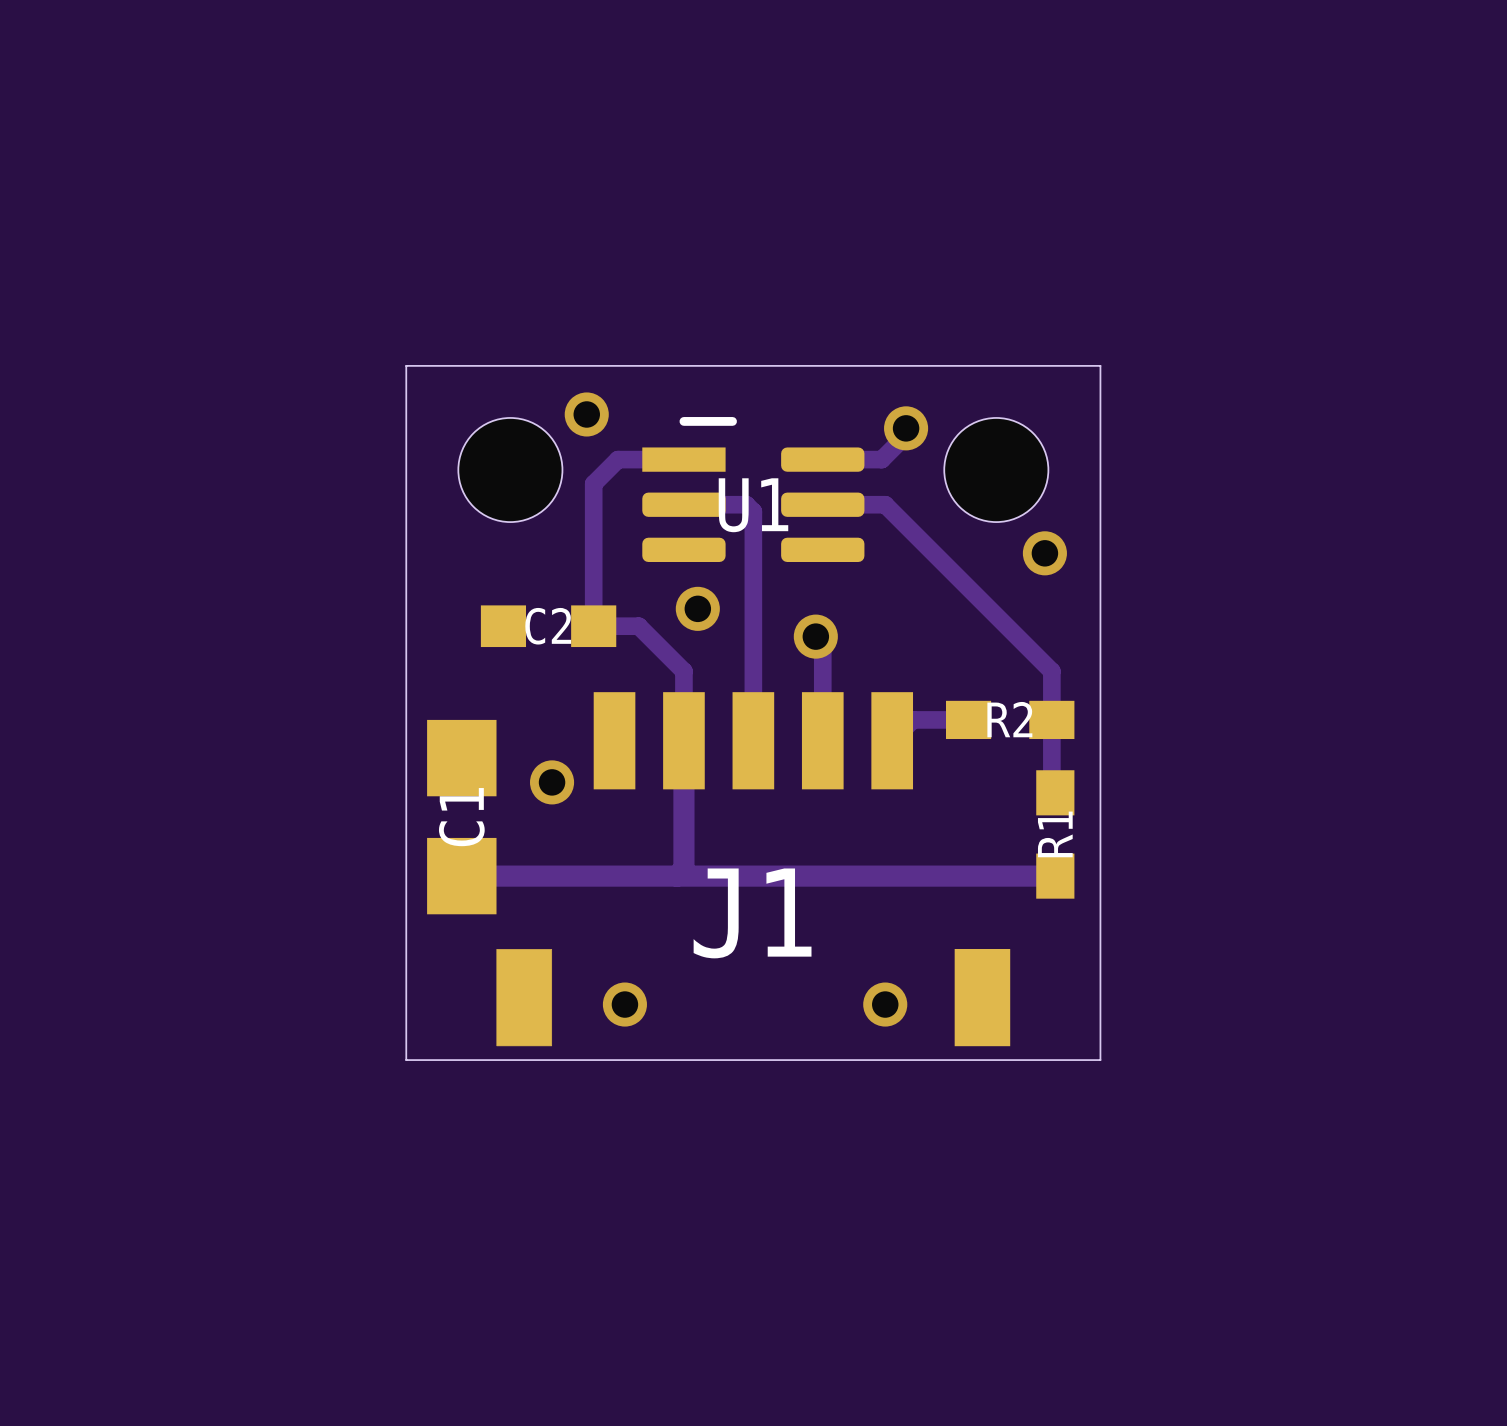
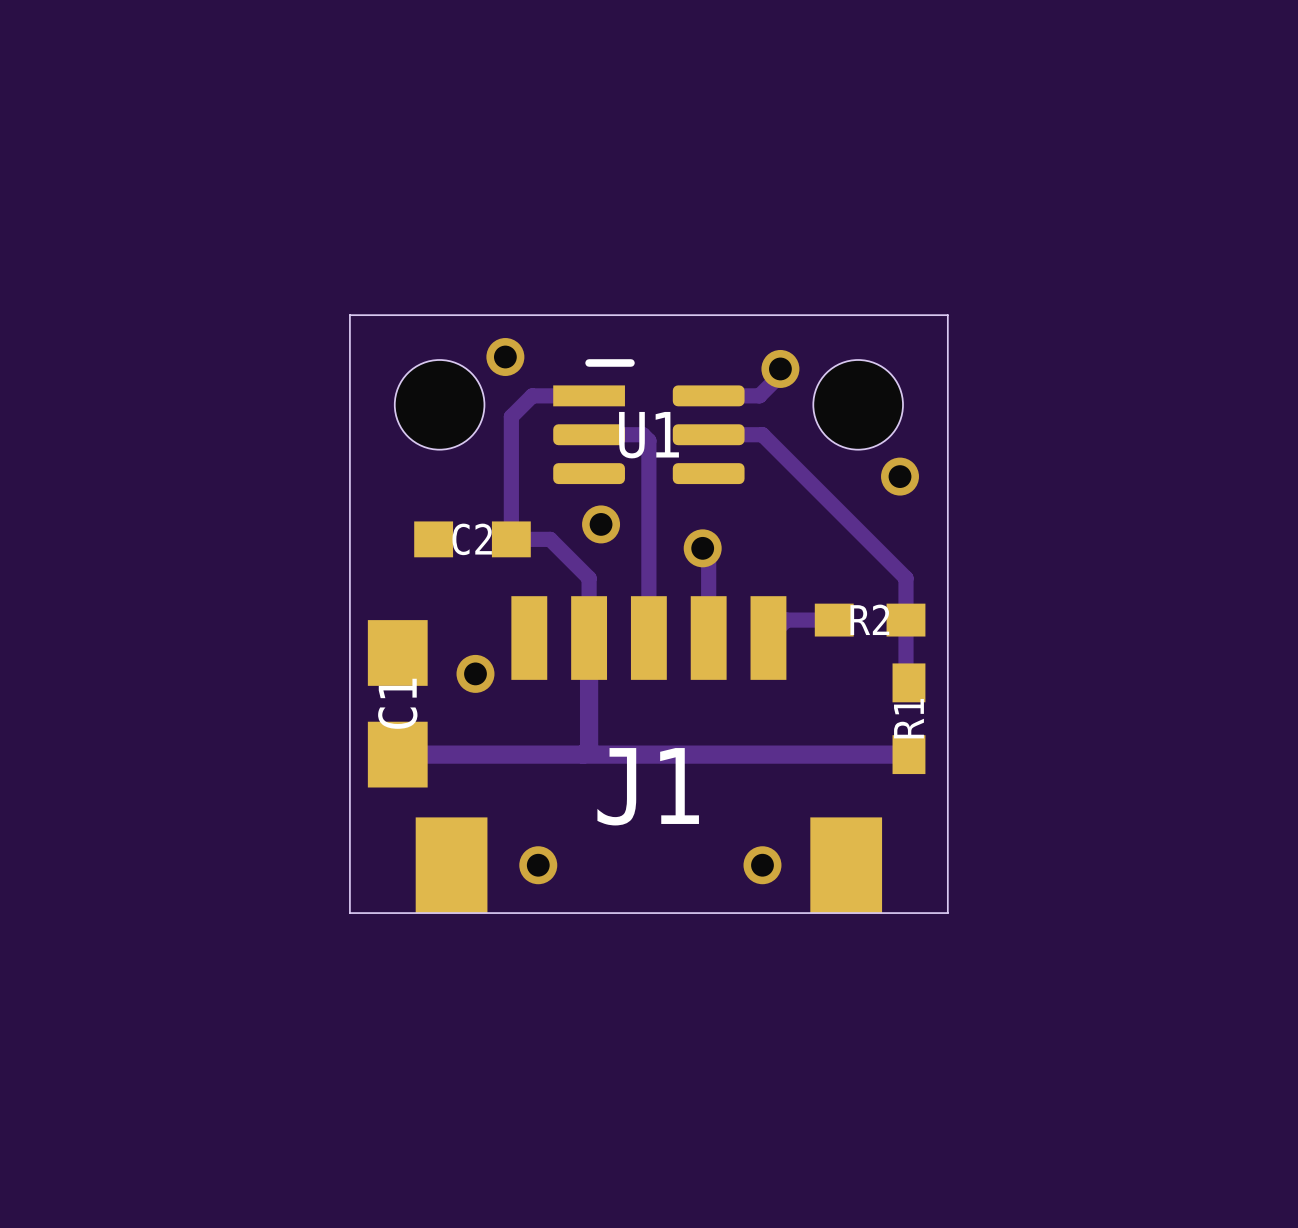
J1 footprint: [496, 692, 1011, 1047] -> [415, 596, 883, 914]

